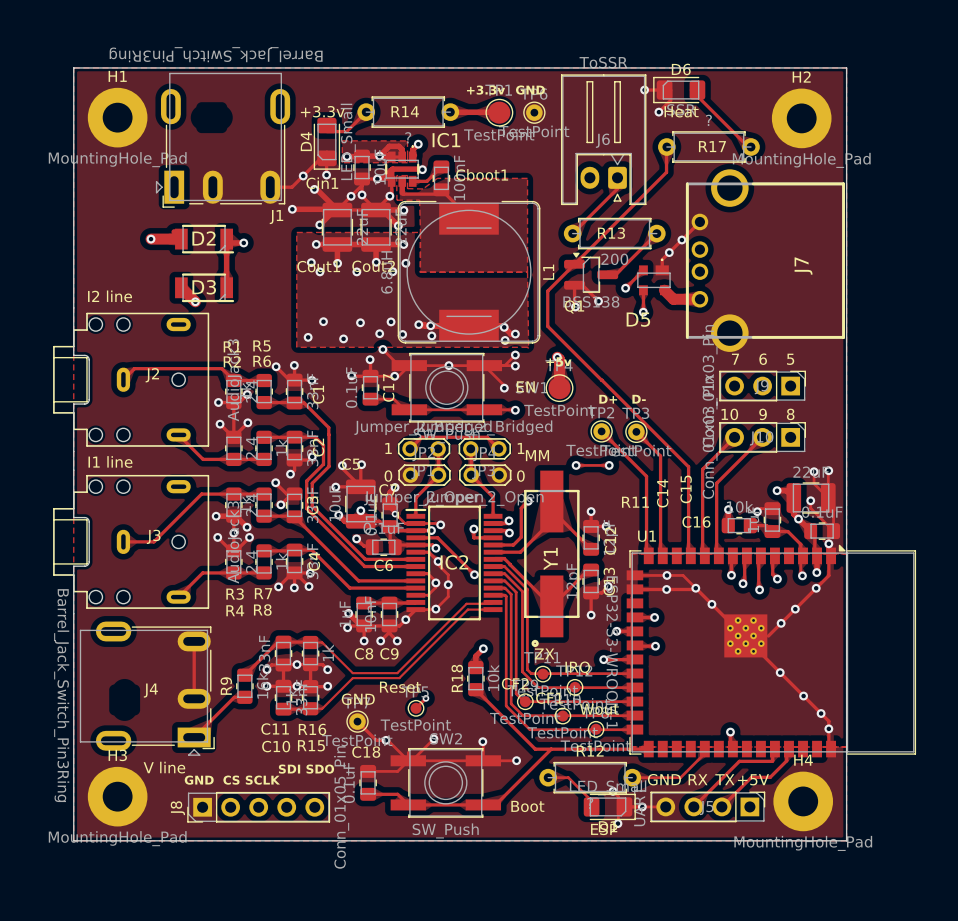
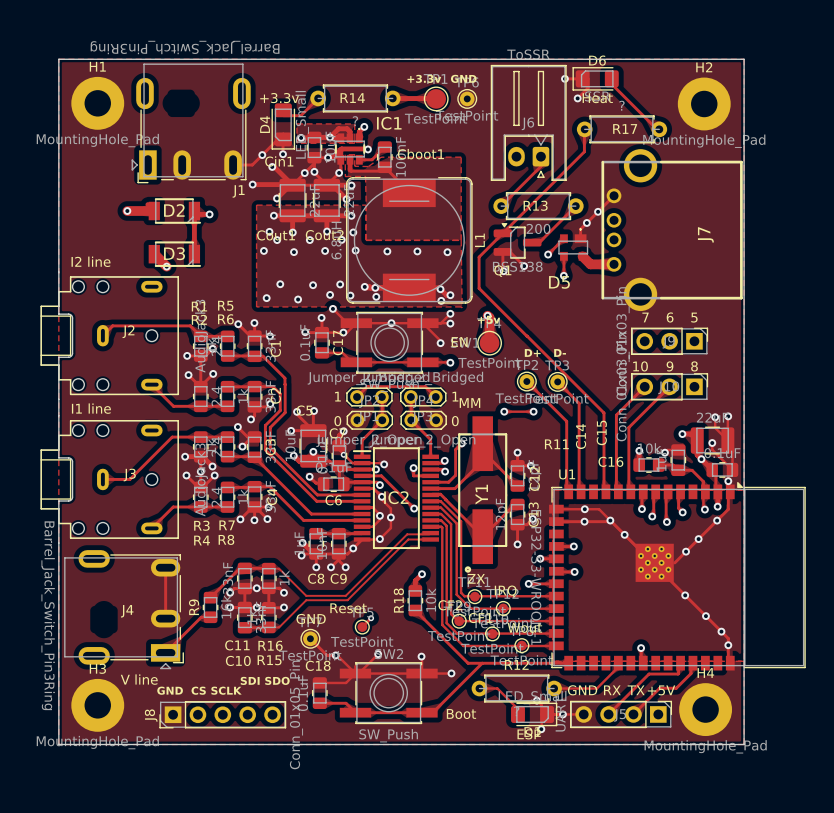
via: none -> (355, 250)
via: none -> (263, 250)
via: none -> (325, 250)
via: none -> (387, 251)
via: none -> (417, 251)
via: none -> (293, 252)
via: none -> (447, 252)

